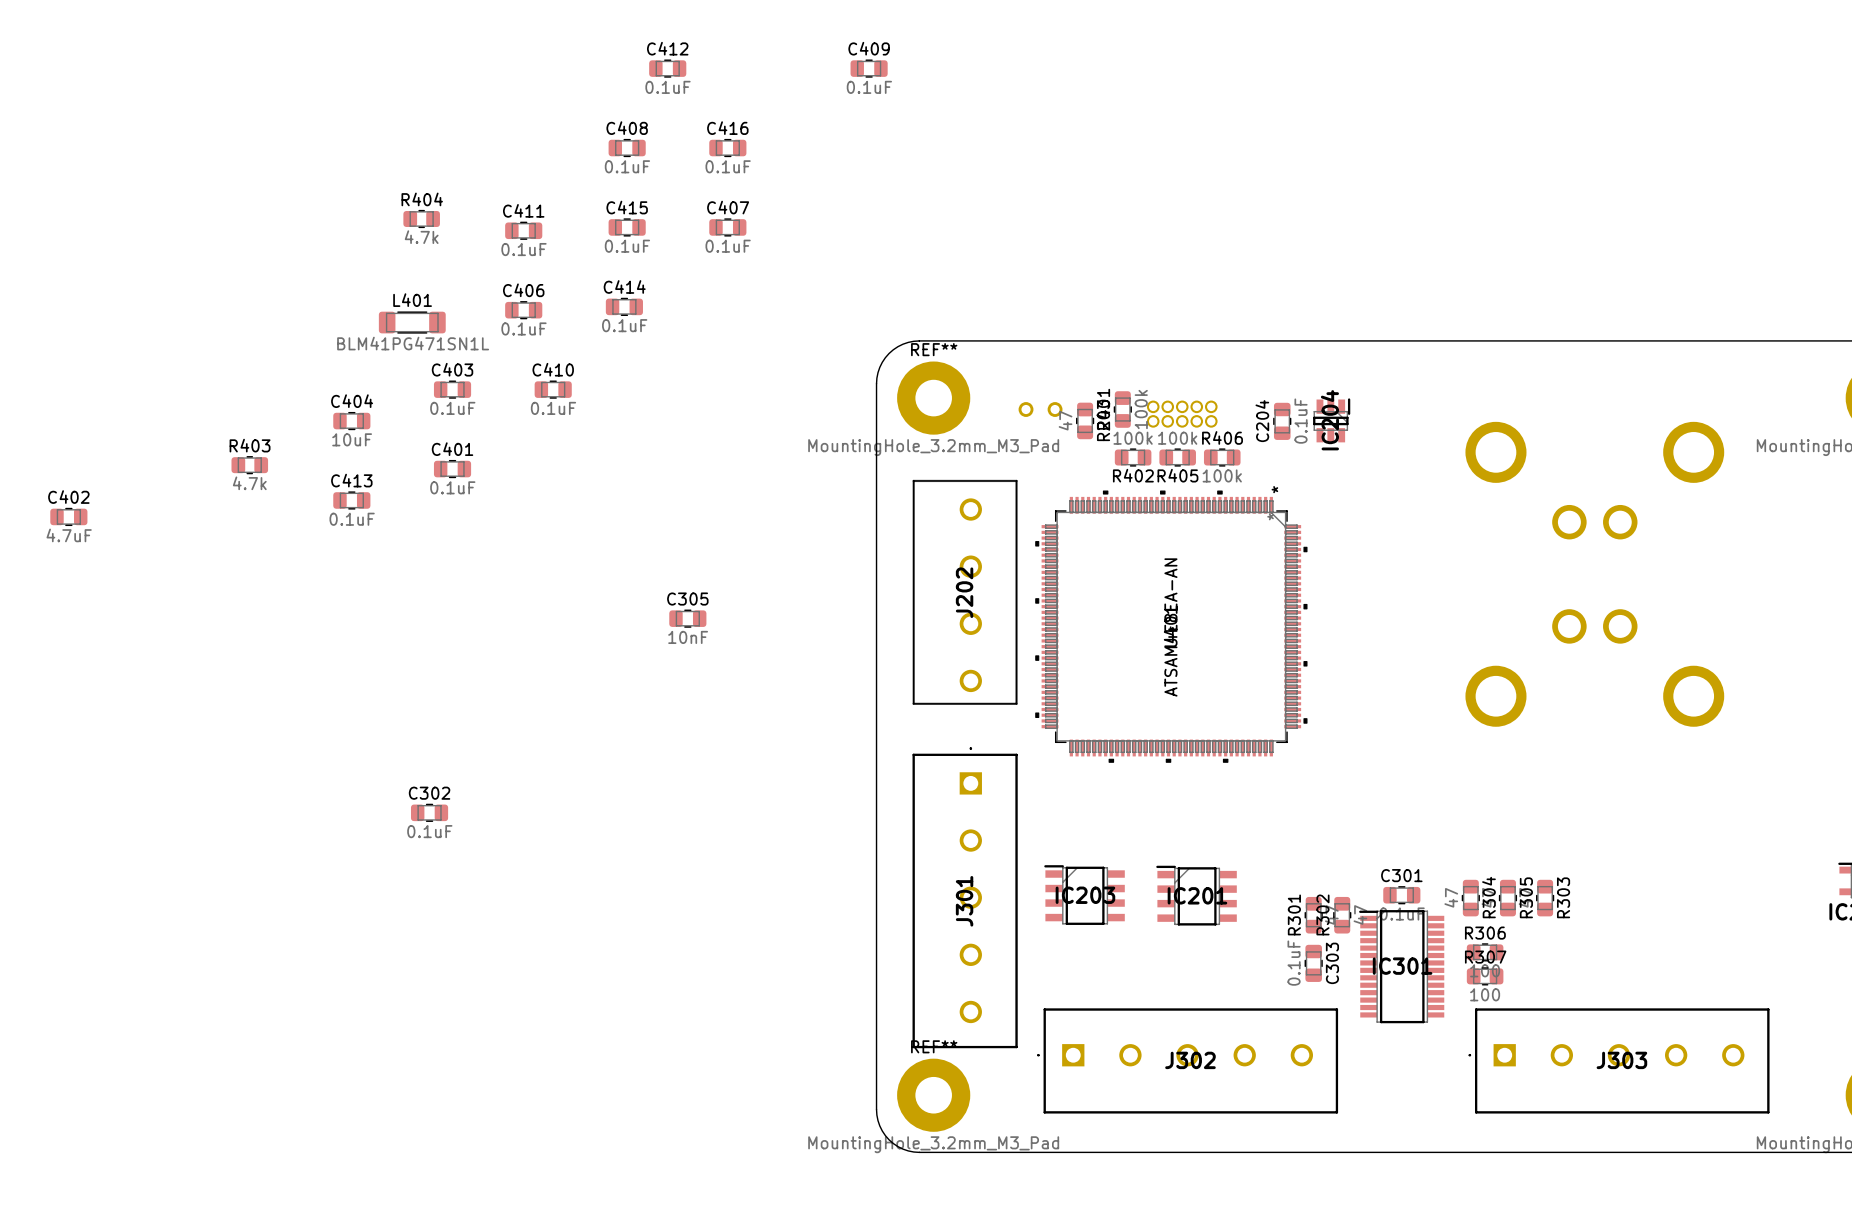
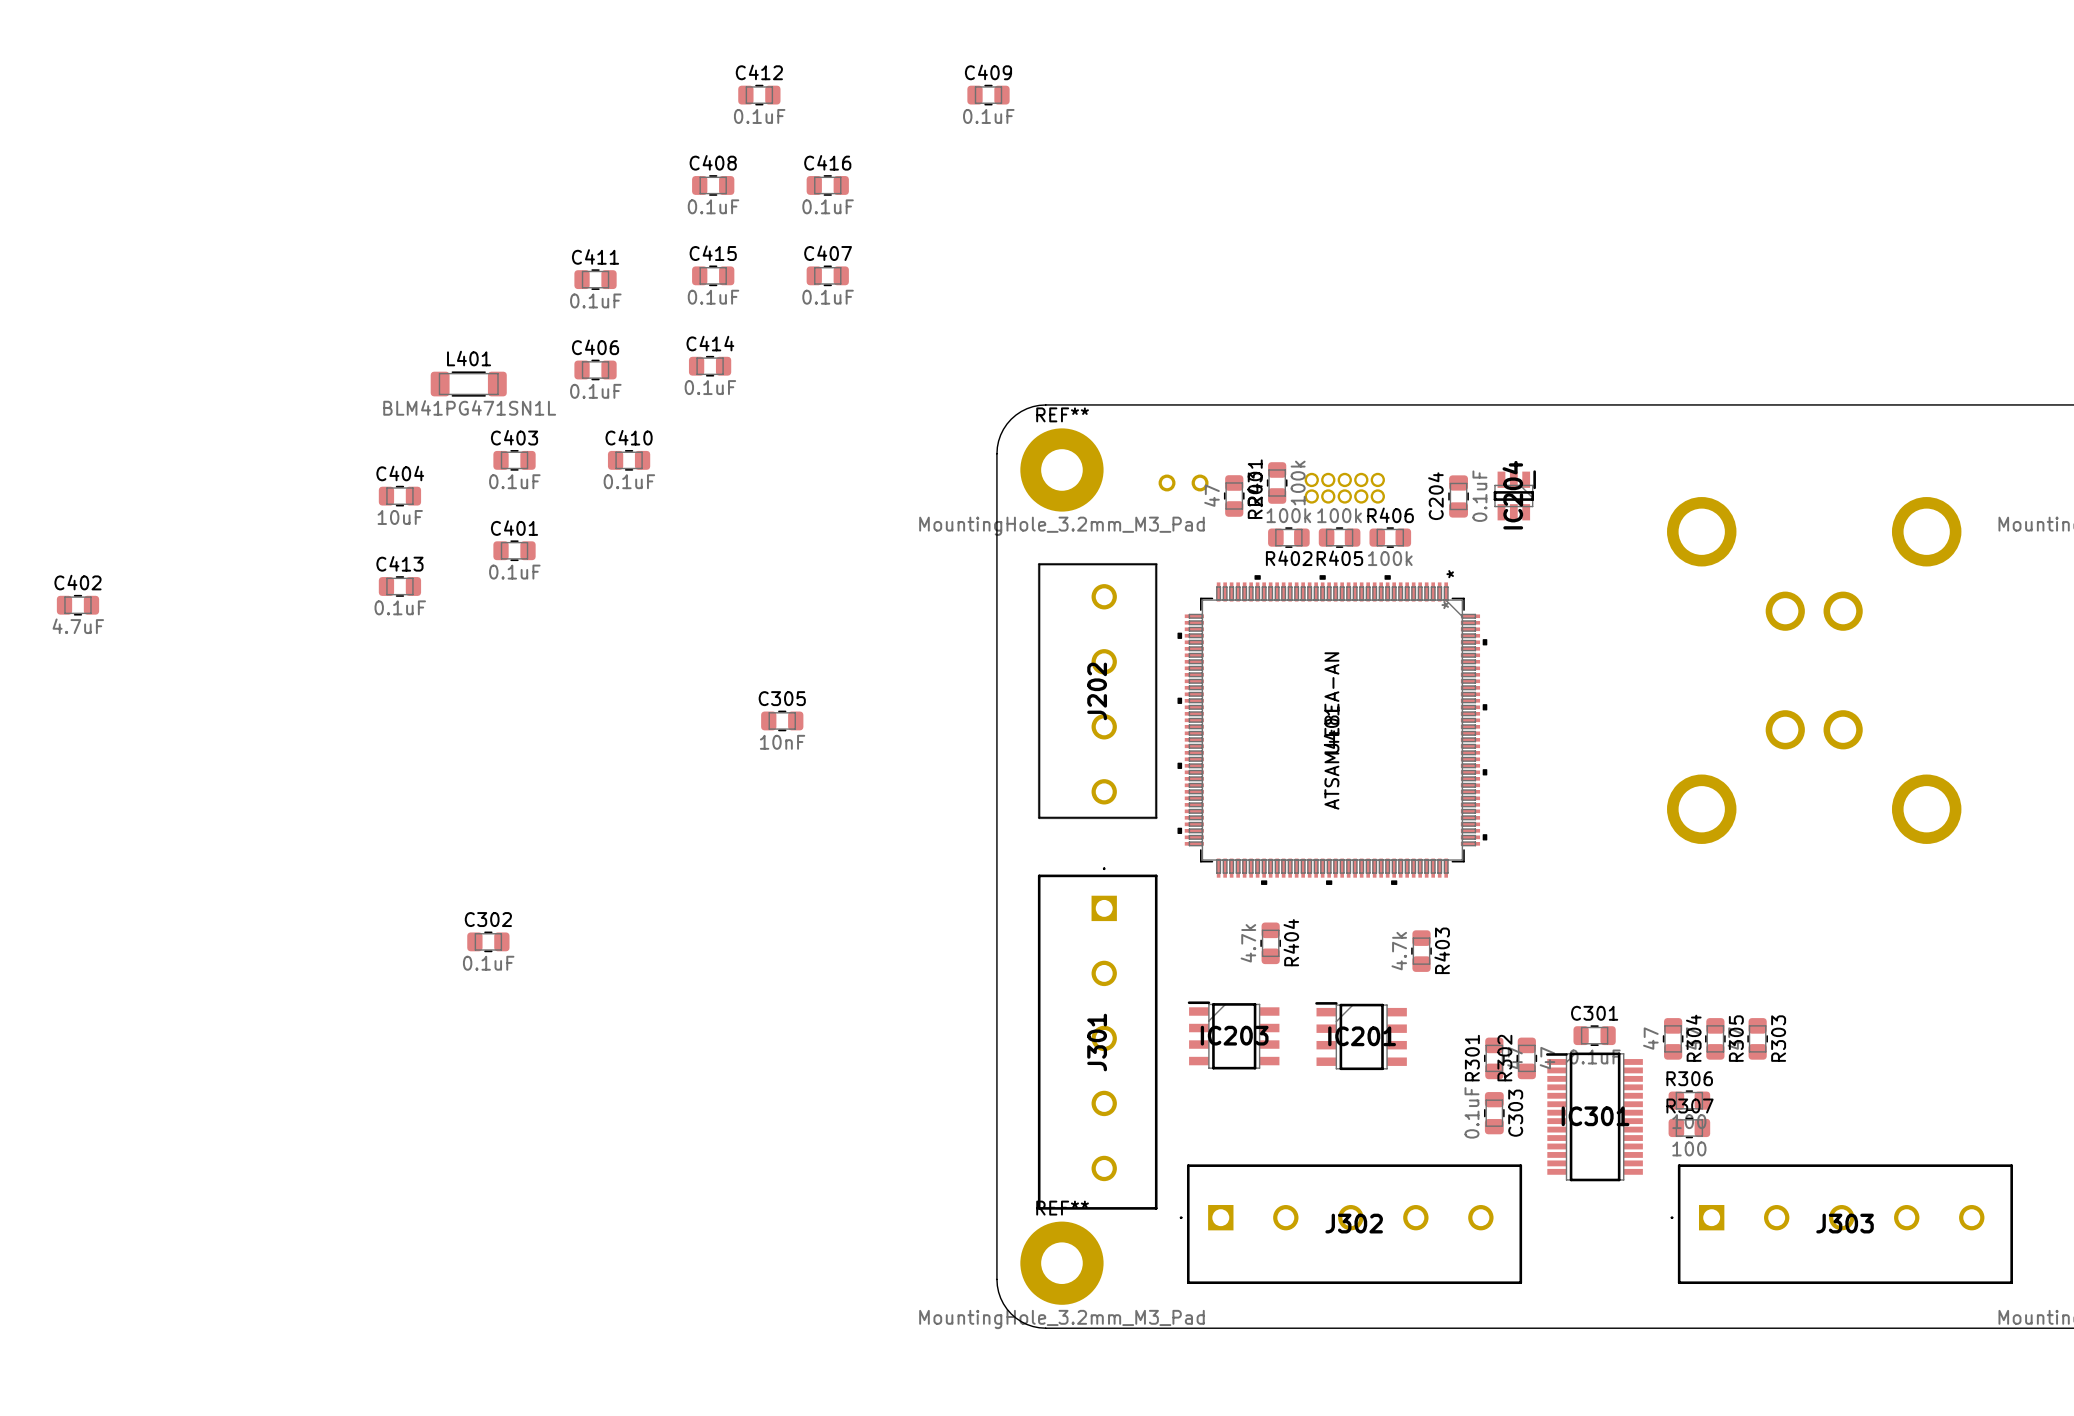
R404 rotation: 0° (421, 218) -> 90° clockwise (1270, 943)
R404 position: (421, 218) -> (1270, 943)
R403 rotation: 0° (249, 465) -> 90° clockwise (1421, 951)
R403 position: (249, 465) -> (1421, 951)

